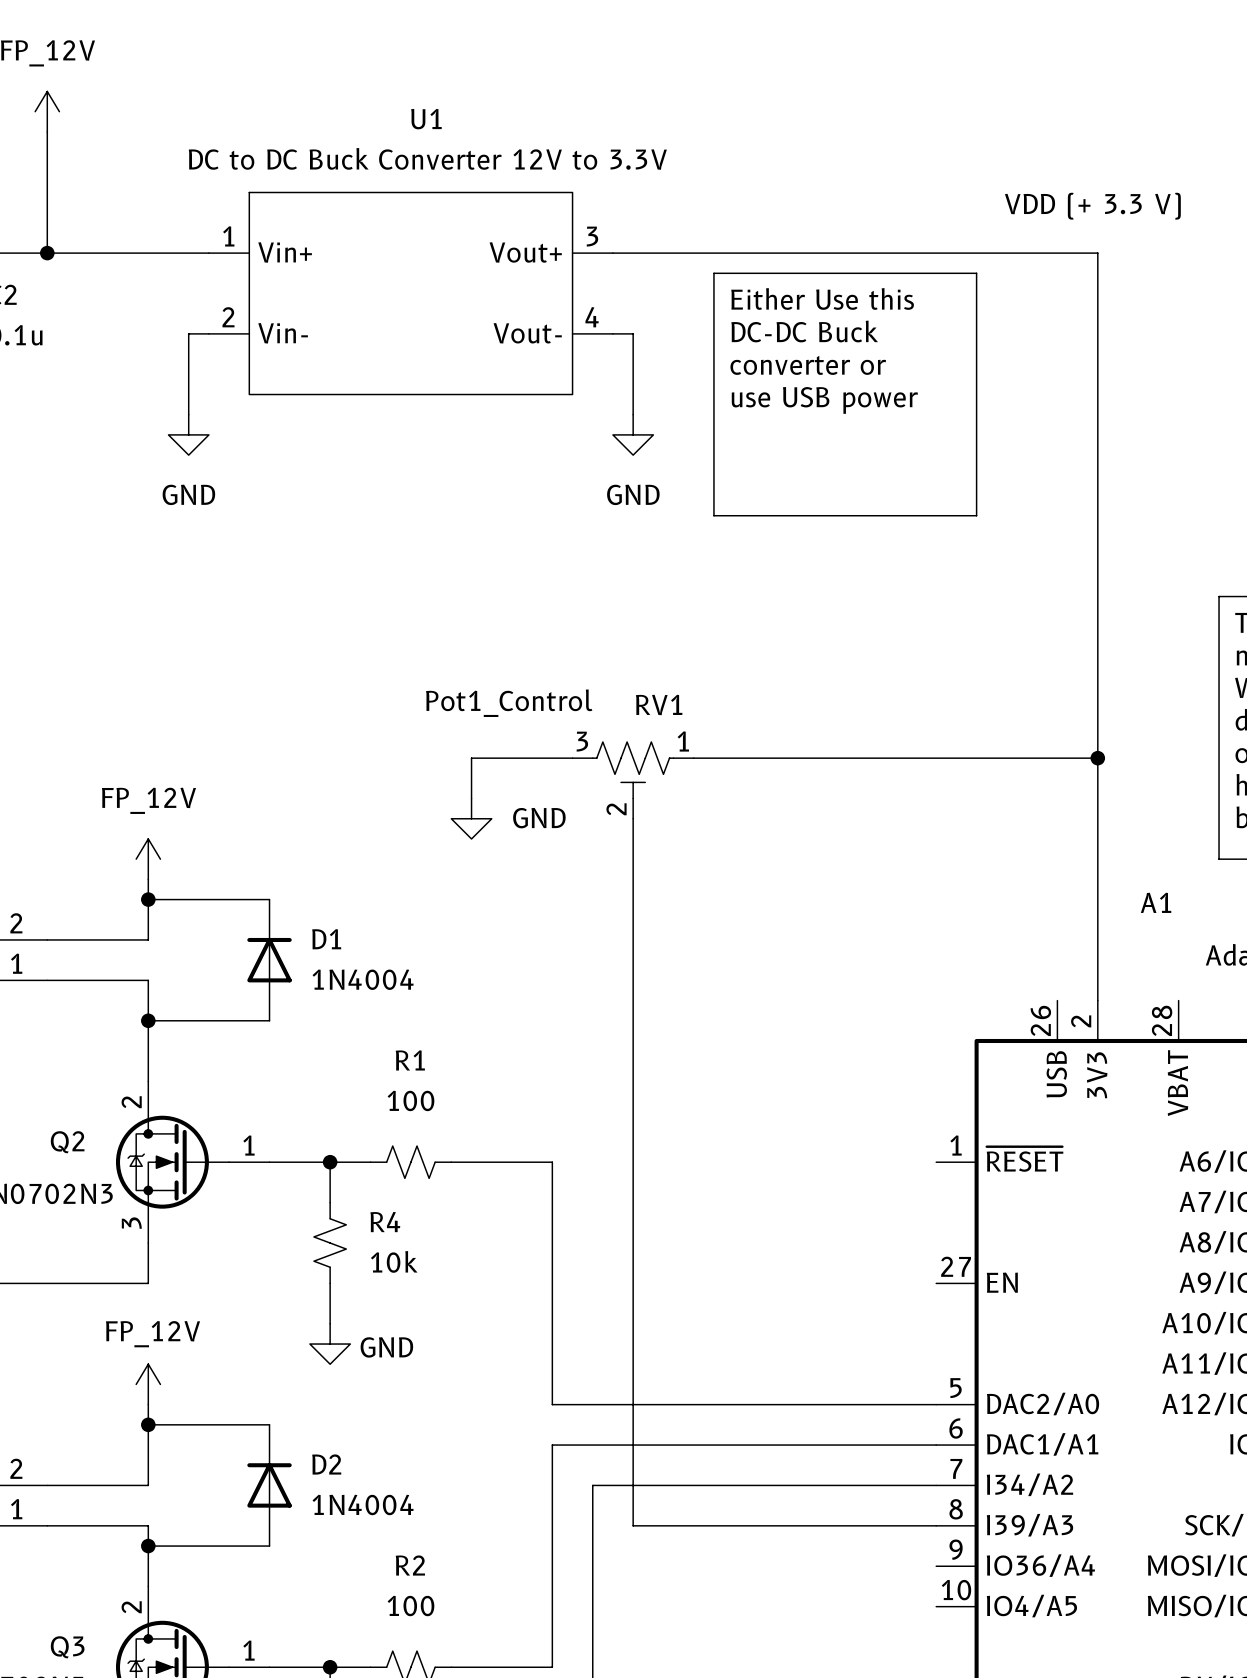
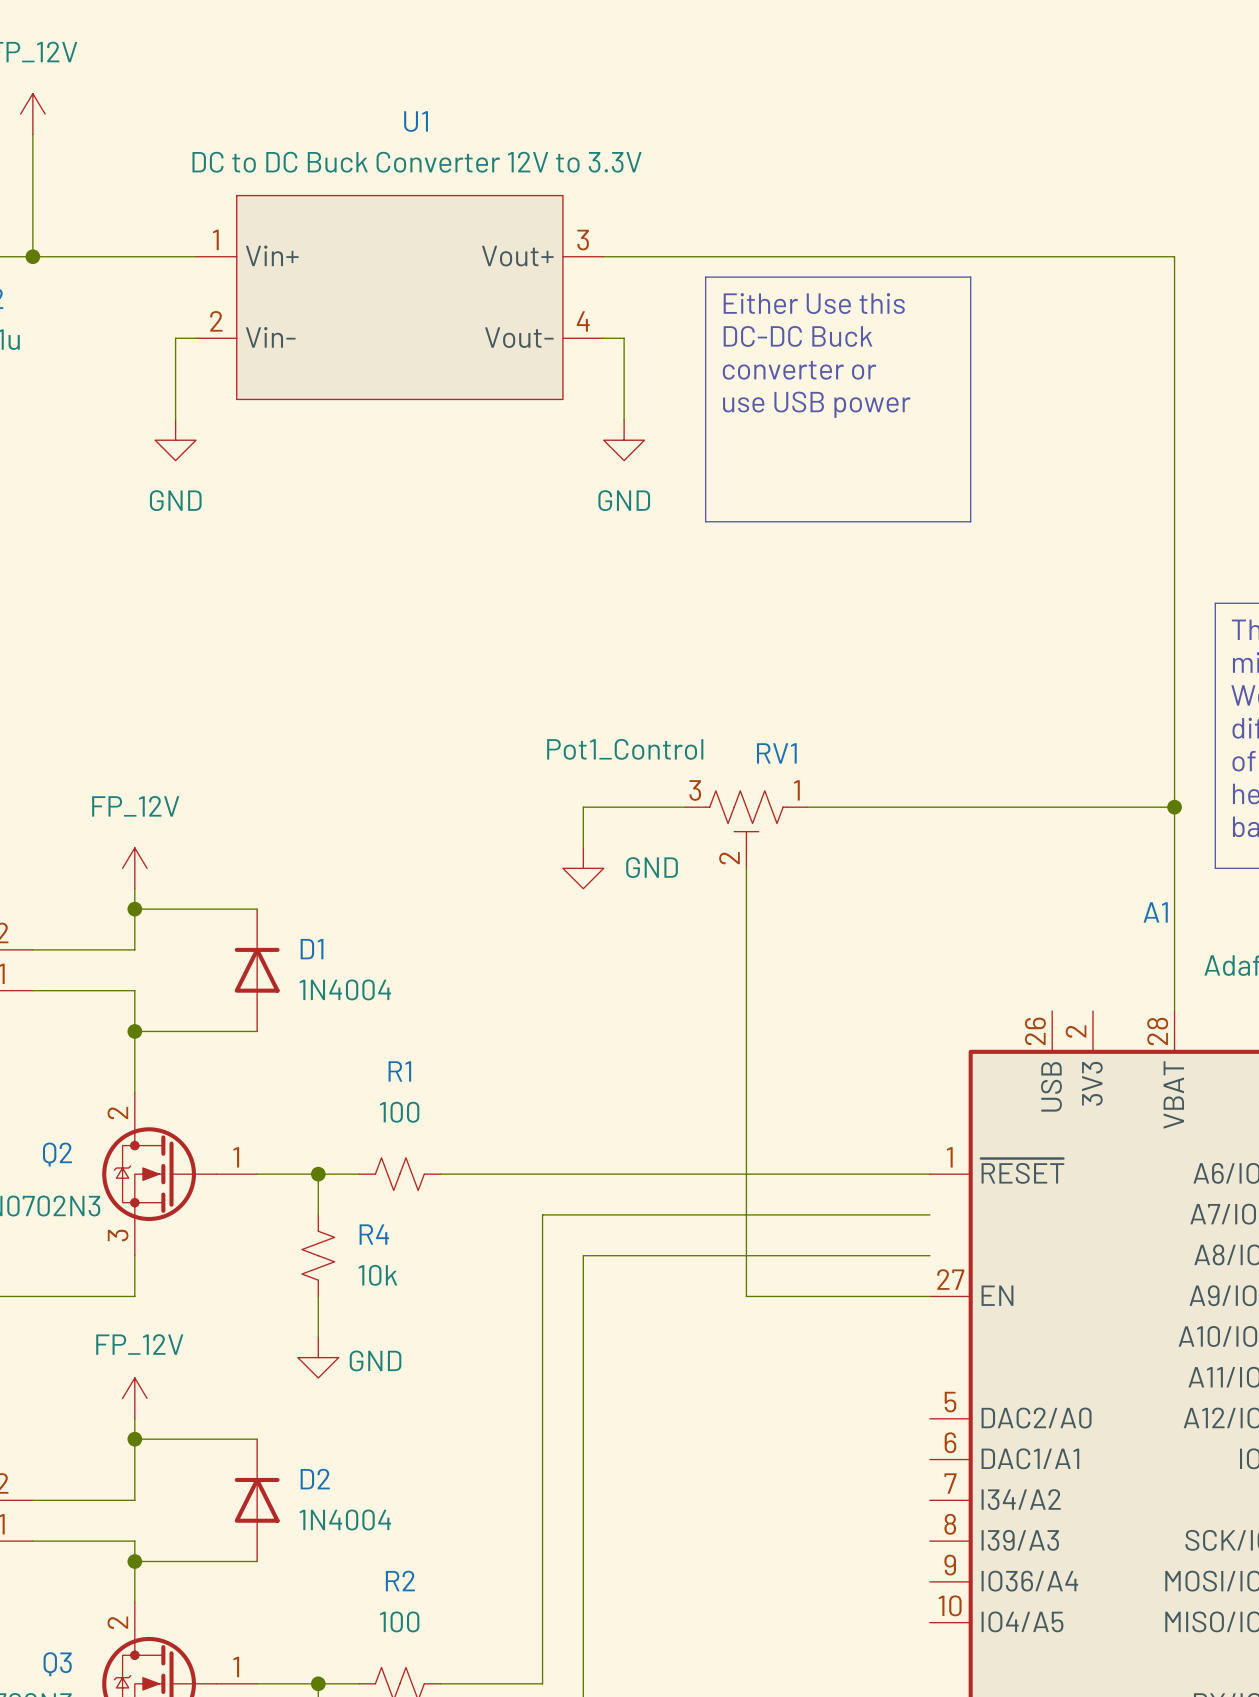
text: VDD (+ 3.3 V) (1092, 206) -> none
wire: (1097, 253) (1097, 1000) -> (1093, 256) (1174, 256) (1174, 1011)
wire: (572, 758) (471, 758) (471, 798) -> (685, 807) (583, 807) (583, 847)
wire: (693, 758) (1097, 758) -> none
junction position: (1097, 758) -> (1174, 807)
RV1 position: (633, 780) -> (746, 829)
wire: none -> (807, 807) (1174, 807)
power symbol position: GND (471, 818) -> GND (583, 868)
wire: (633, 818) (633, 1525) (936, 1525) -> none
wire: none -> (746, 868) (746, 1296) (929, 1296)
wire: (552, 1162) (552, 1202) -> (542, 1174) (929, 1174)
wire: (552, 1404) (936, 1404) -> (542, 1418) (542, 1459)
wire: (552, 1445) (936, 1445) -> (542, 1214) (929, 1214)
wire: (592, 1485) (936, 1485) -> (583, 1500) (583, 1255) (929, 1255)

